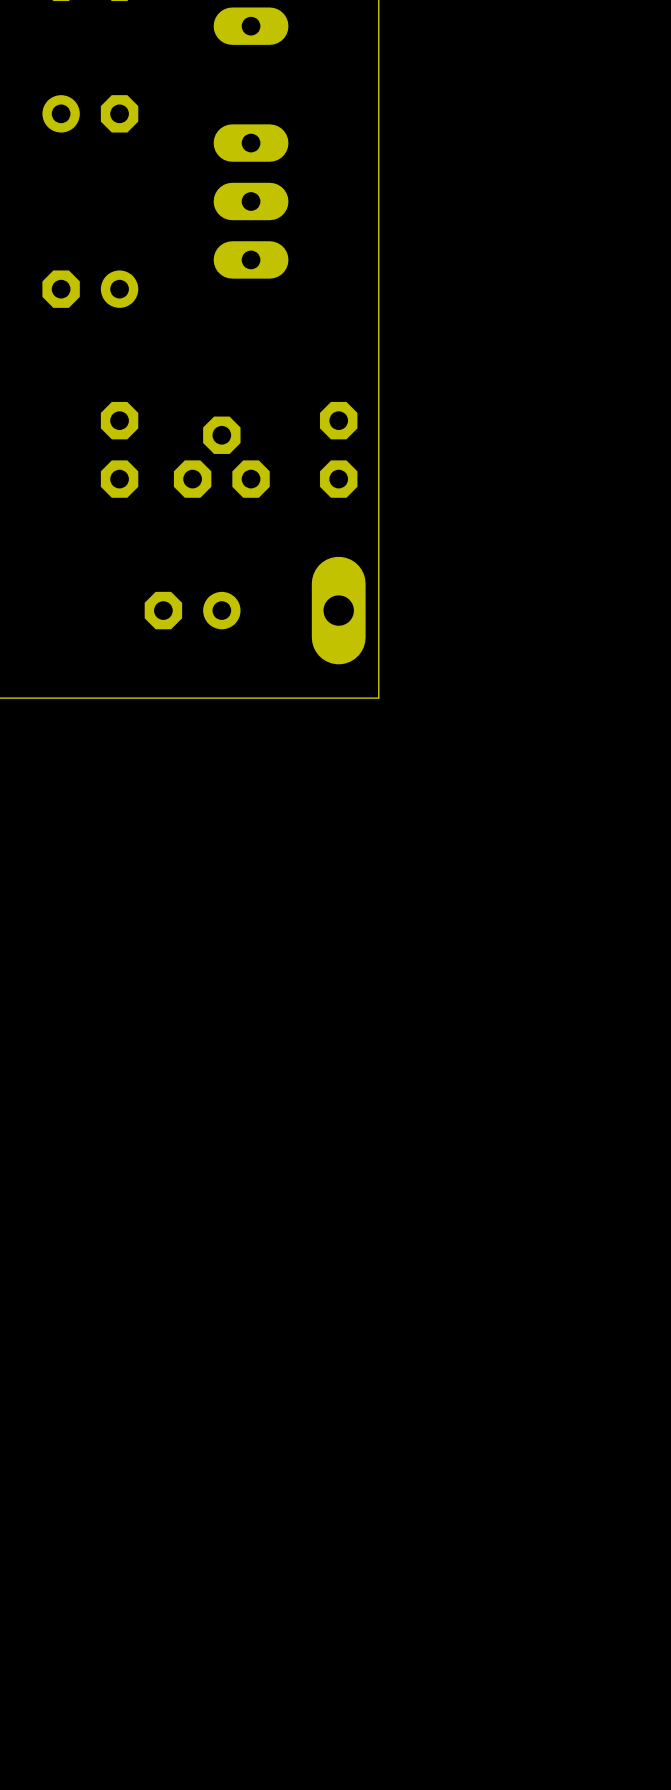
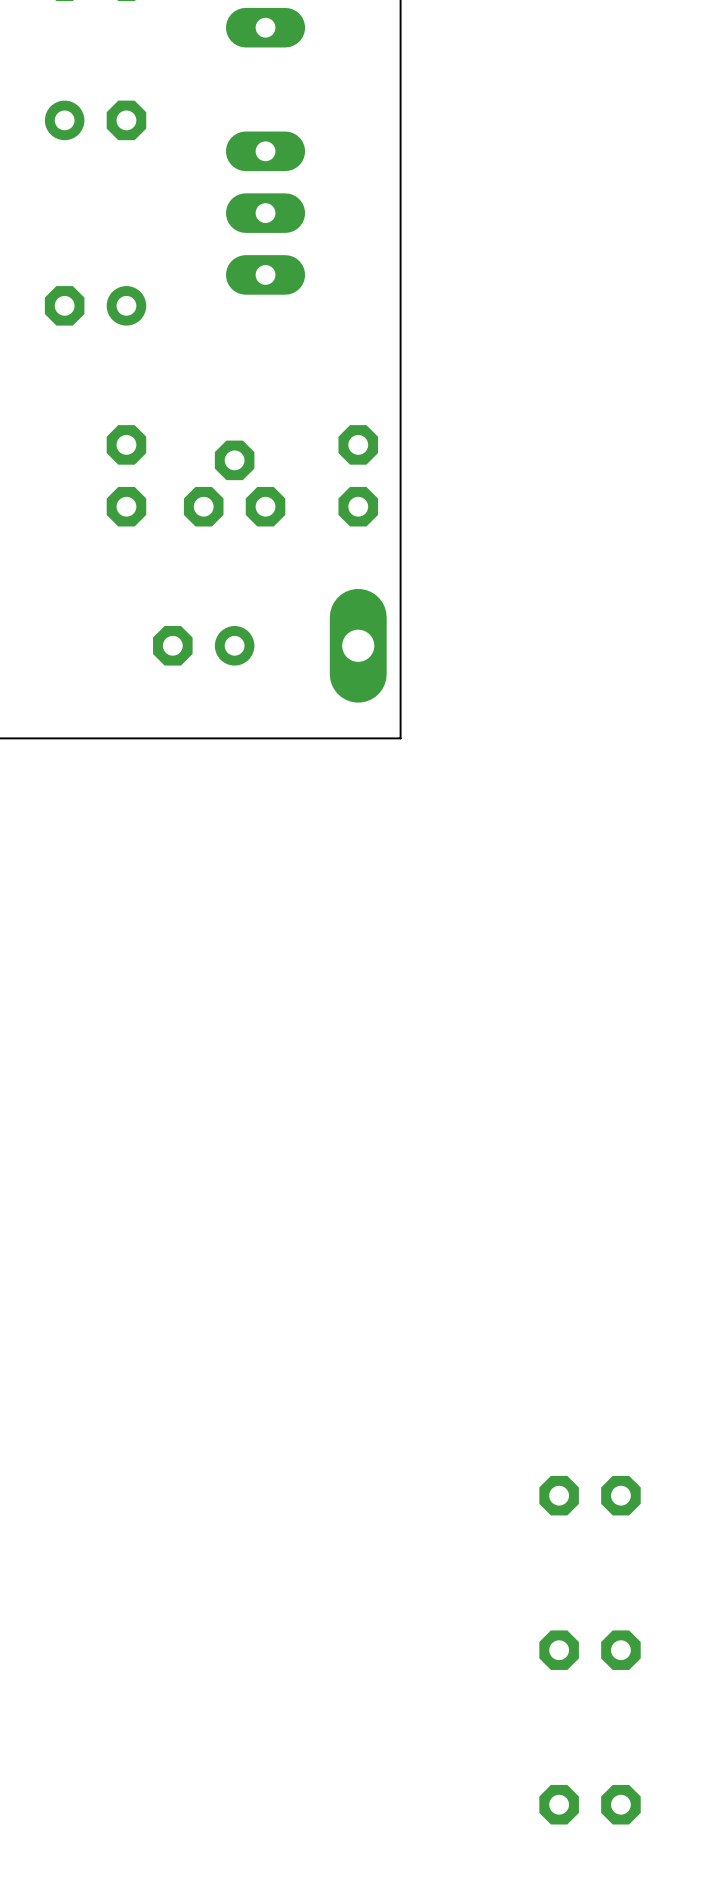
part: none -> (590, 1495)
part: none -> (590, 1650)
part: none -> (590, 1804)

